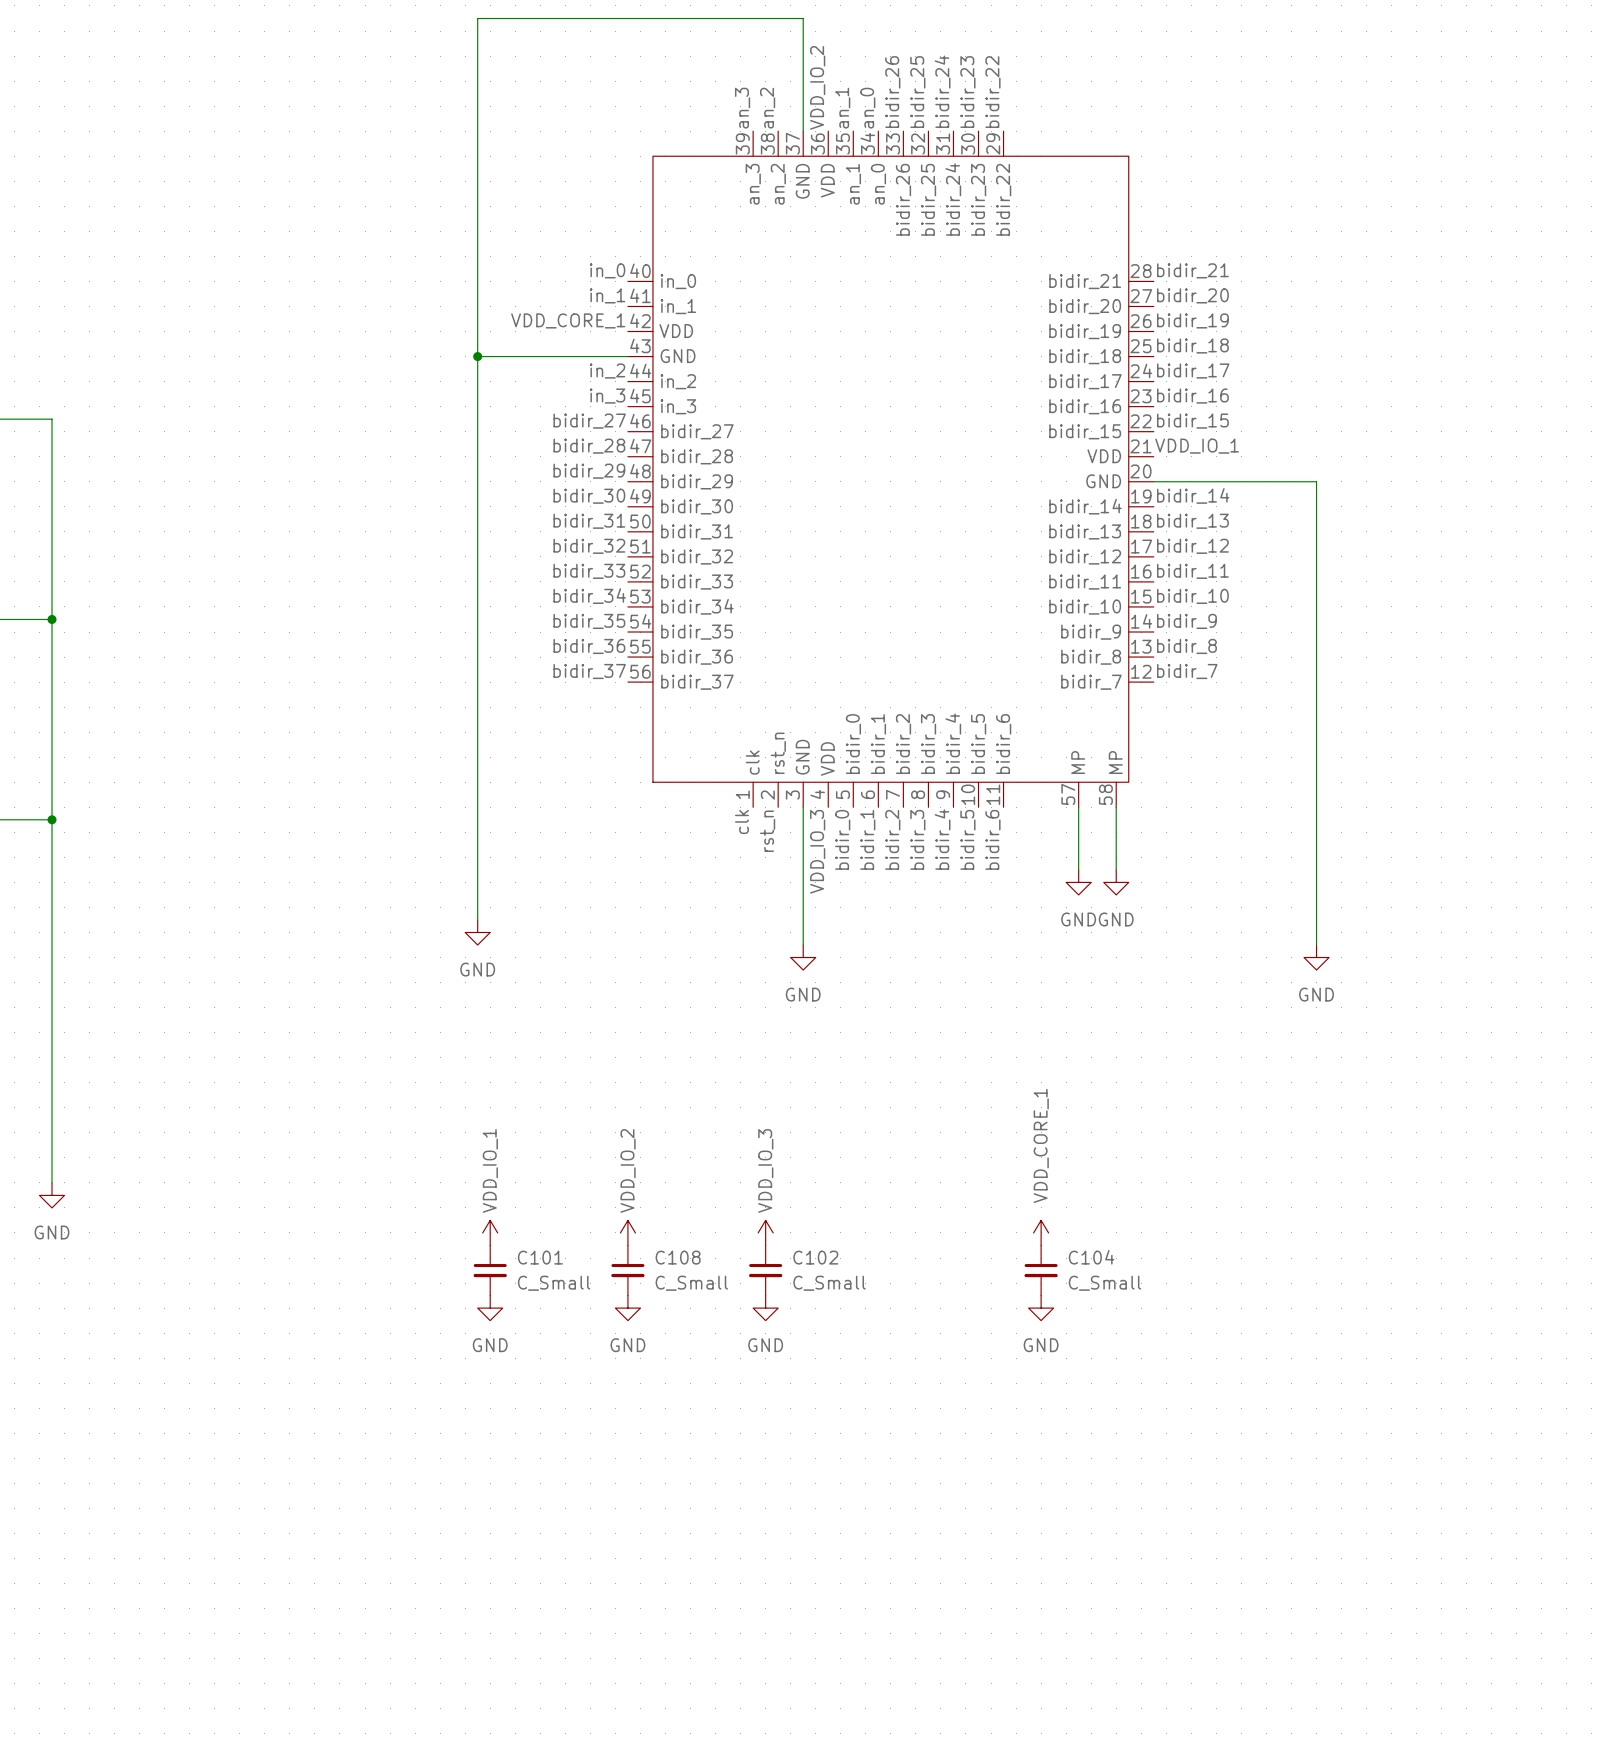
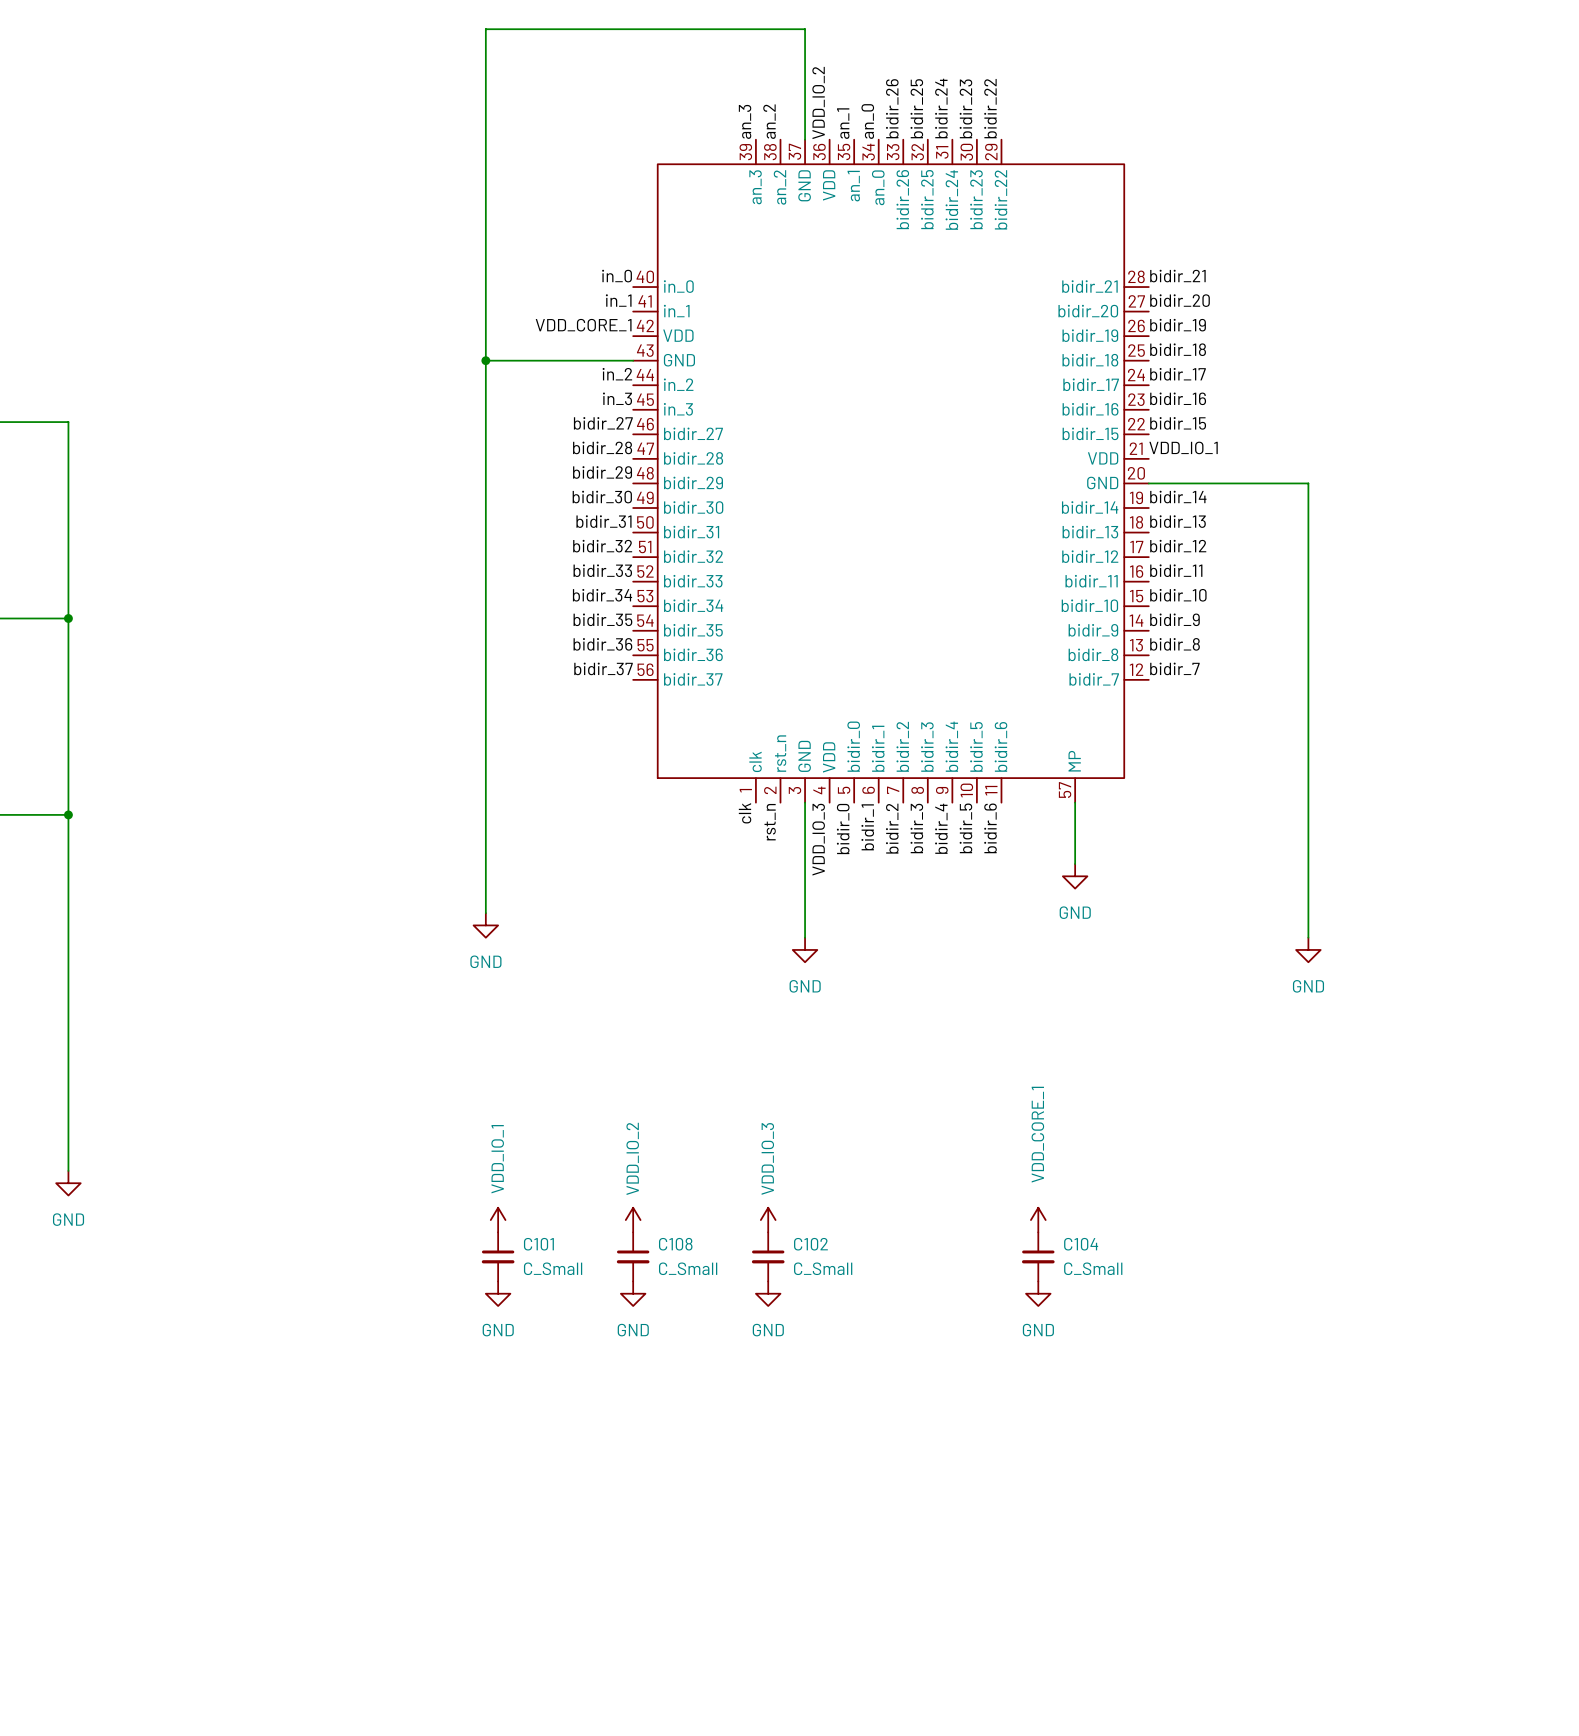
part symbol: [627, 131, 1154, 808] -> [633, 139, 1149, 803]
wire: (1116, 807) (1116, 869) -> none
power symbol: GND (1116, 882) -> none

